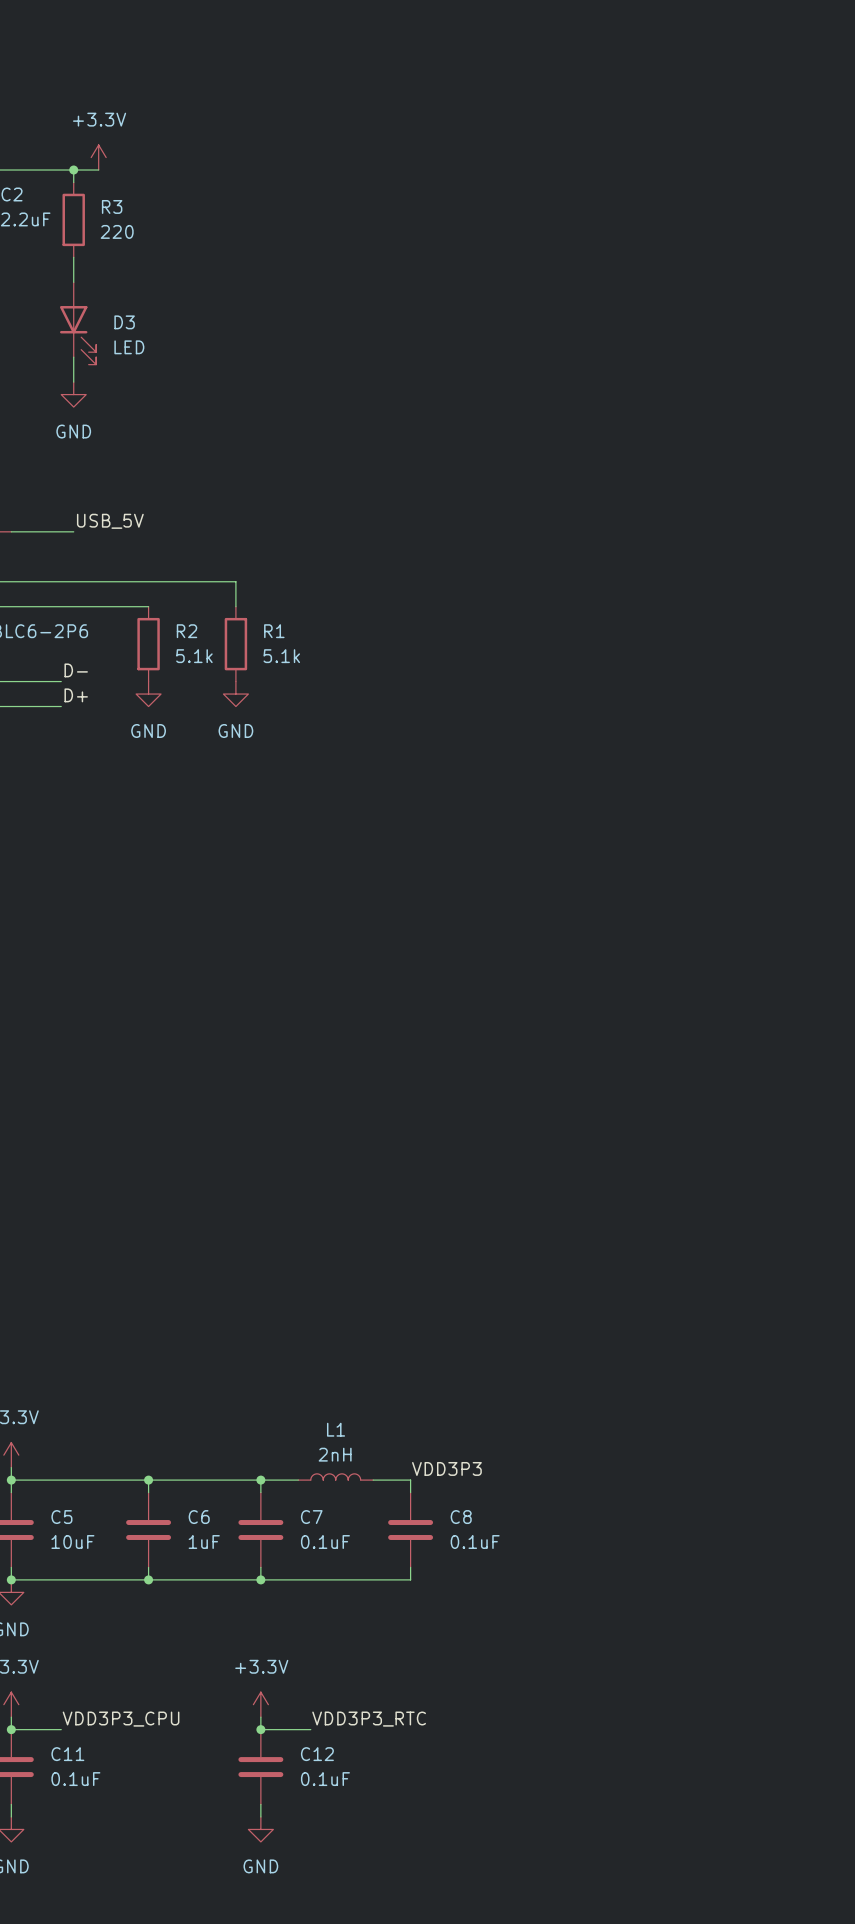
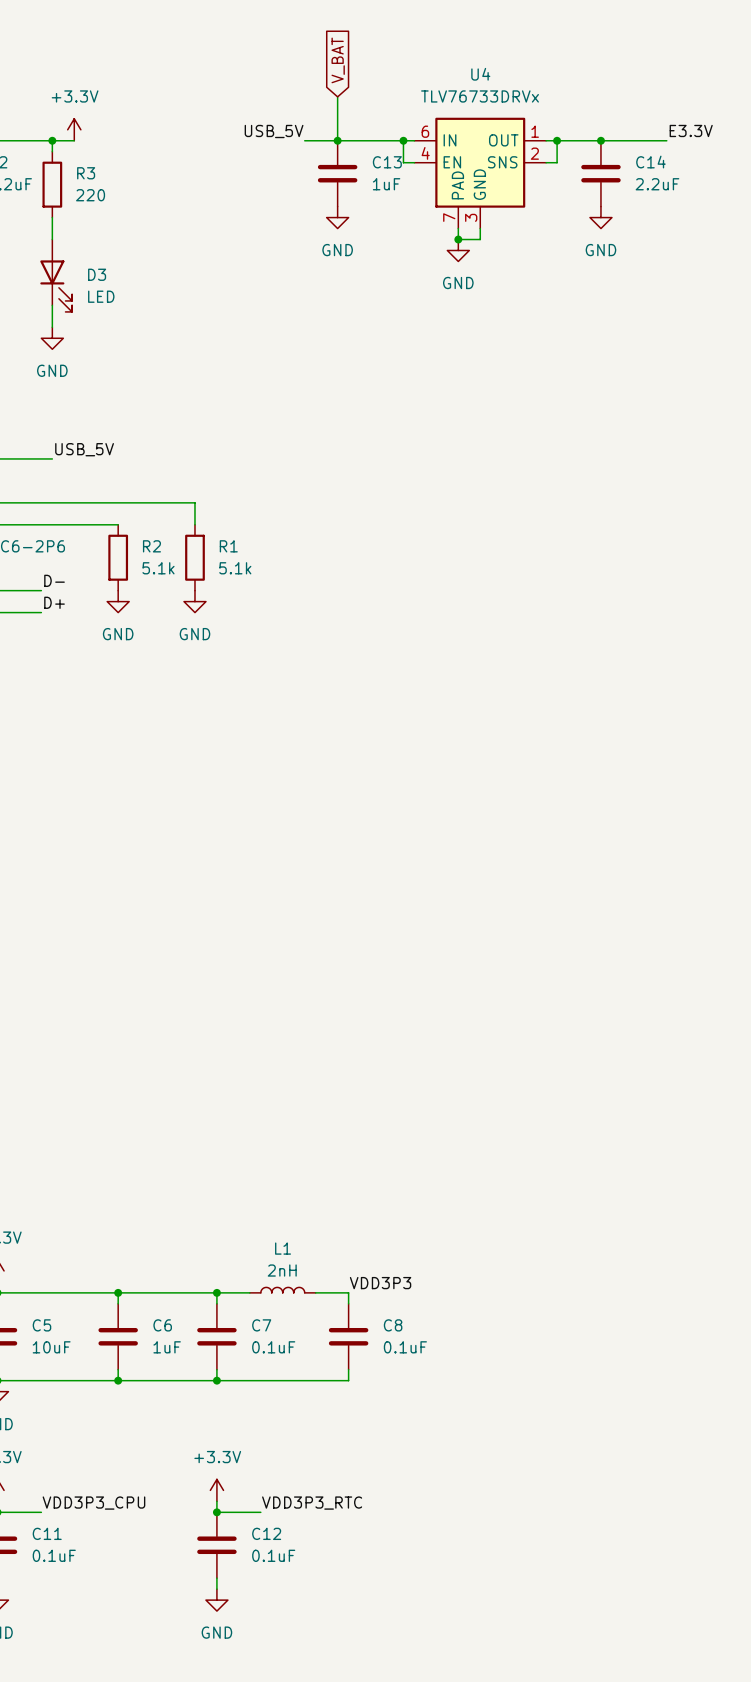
global label: none -> V_BAT (338, 60)
wire: none -> (337, 96) (337, 140)
label: none -> E3.3V (691, 130)
label: none -> USB_5V (274, 131)
wire: none -> (304, 140) (414, 140)
junction: none -> (337, 140)
wire: none -> (403, 140) (403, 162) (414, 162)
junction: none -> (403, 140)
wire: none -> (546, 140) (666, 140)
wire: none -> (557, 140) (557, 162) (546, 162)
junction: none -> (557, 140)
junction: none -> (600, 140)
U4: none -> TLV76733DRVx (480, 173)
C13: none -> 1uF (337, 173)
C14: none -> 2.2uF (600, 173)
power symbol: none -> GND (337, 217)
power symbol: none -> GND (600, 217)
wire: none -> (458, 228) (458, 239) (480, 239) (480, 228)
junction: none -> (458, 239)
power symbol: none -> GND (458, 250)

